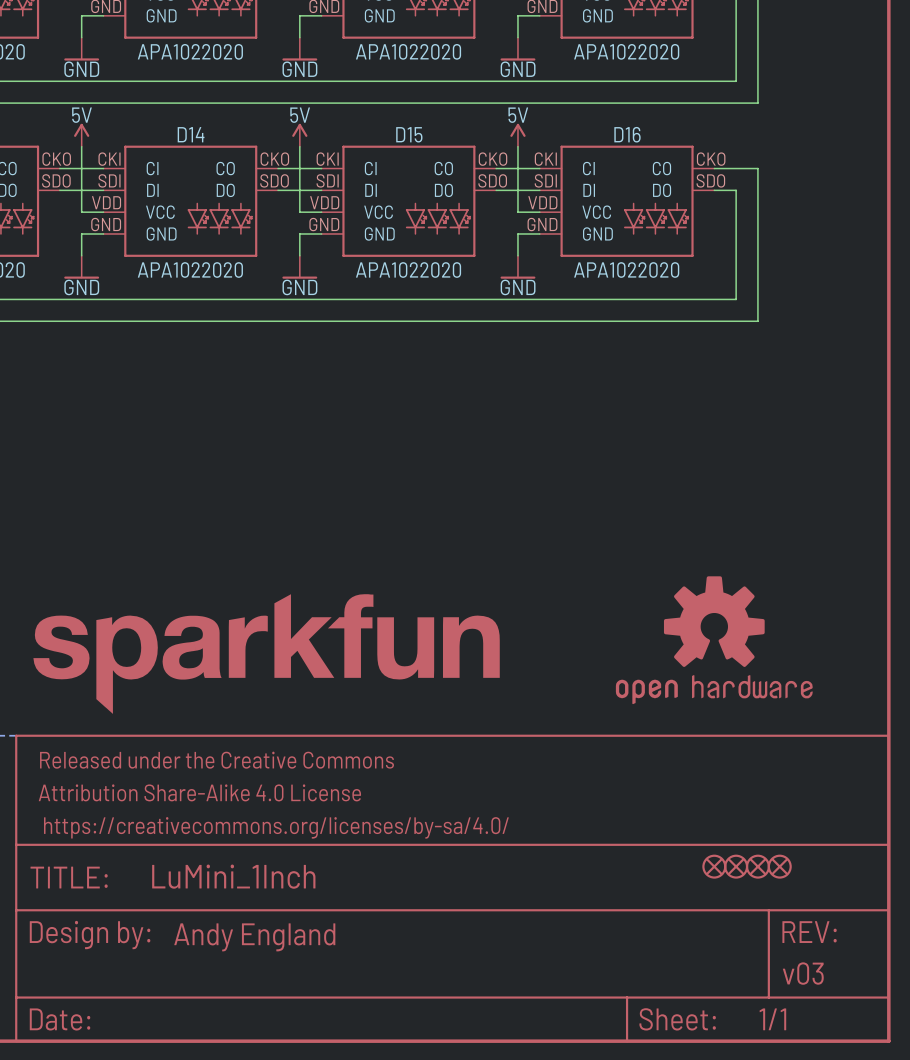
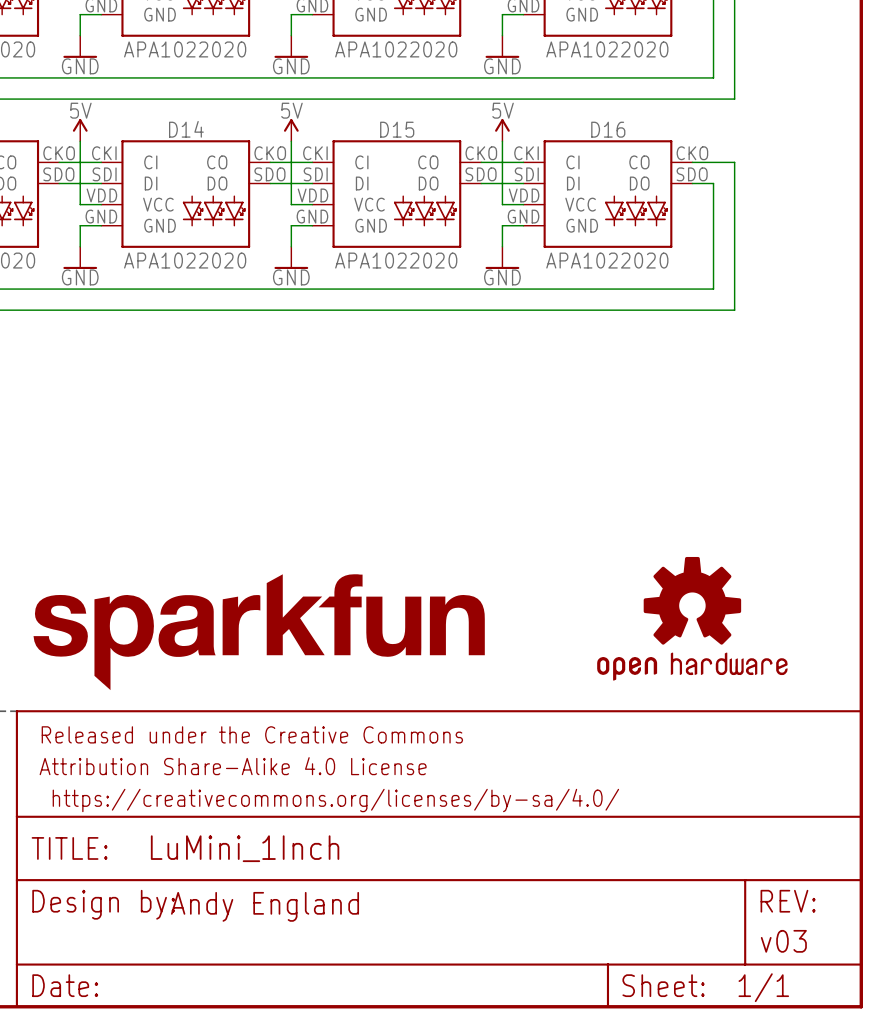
part: (714, 866) -> none
part: (736, 866) -> none
part: (757, 866) -> none
part: (779, 866) -> none

